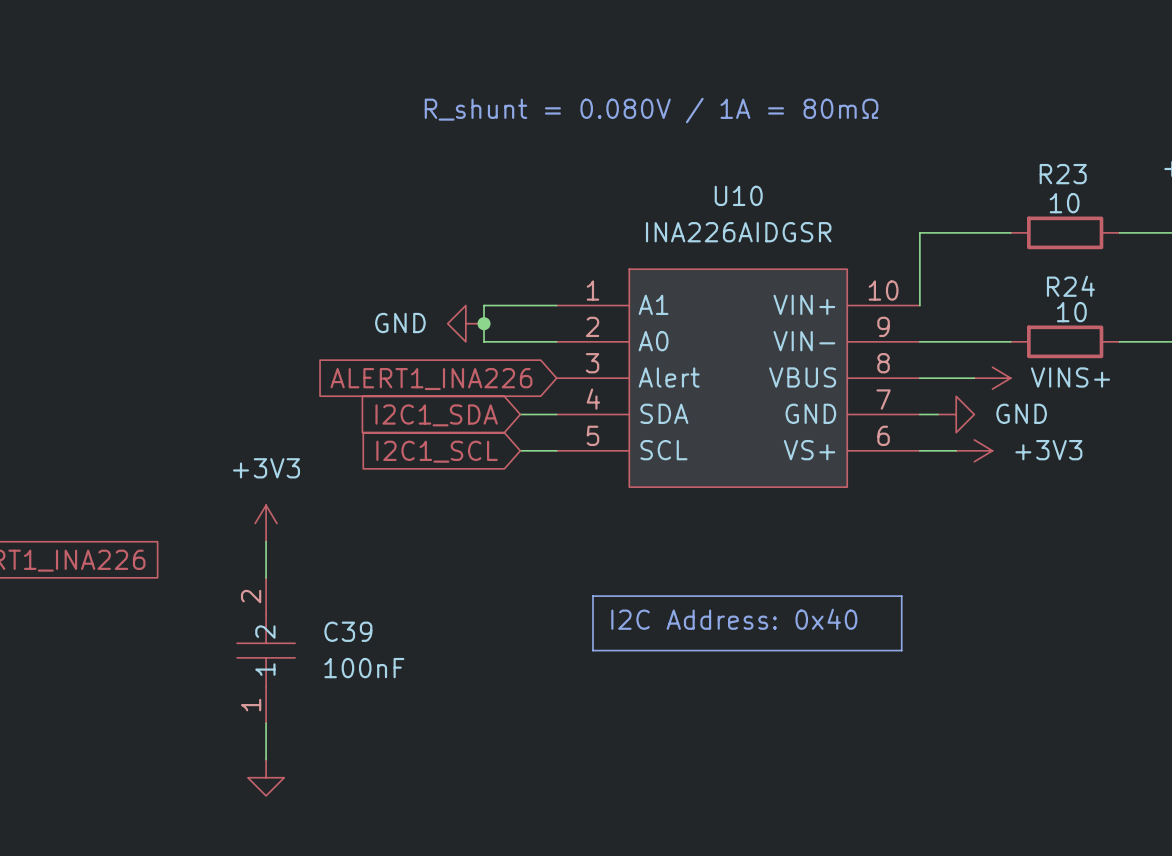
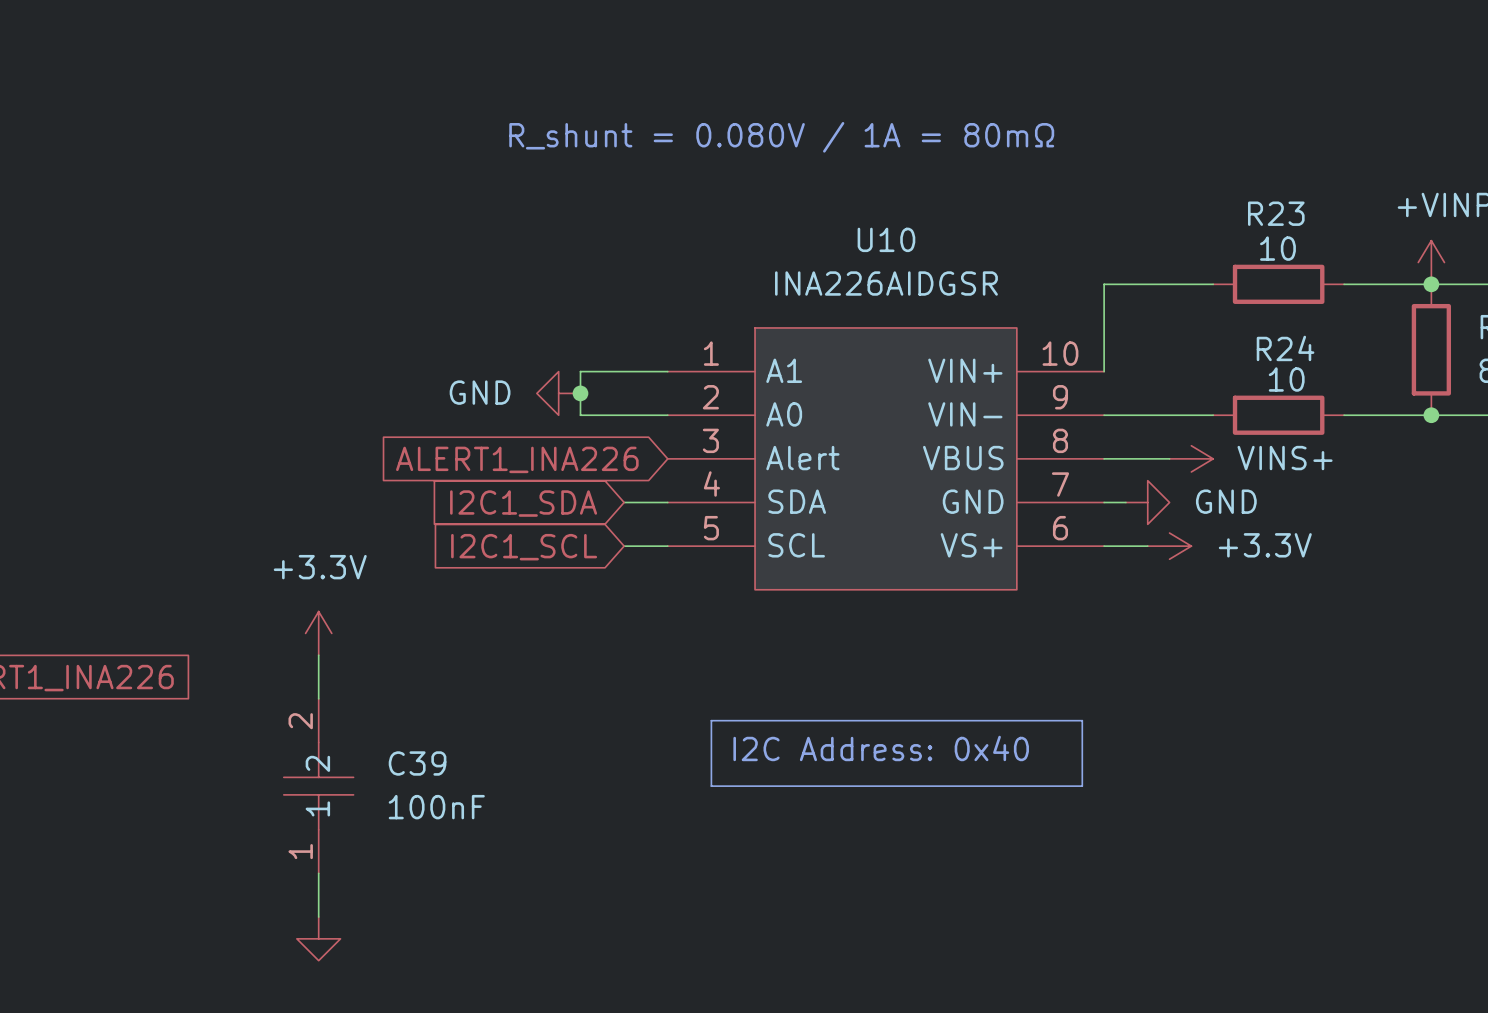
power symbol: +3V3 (974, 450) -> +3.3V (1169, 546)
power symbol: +3V3 (266, 523) -> +3.3V (318, 633)

